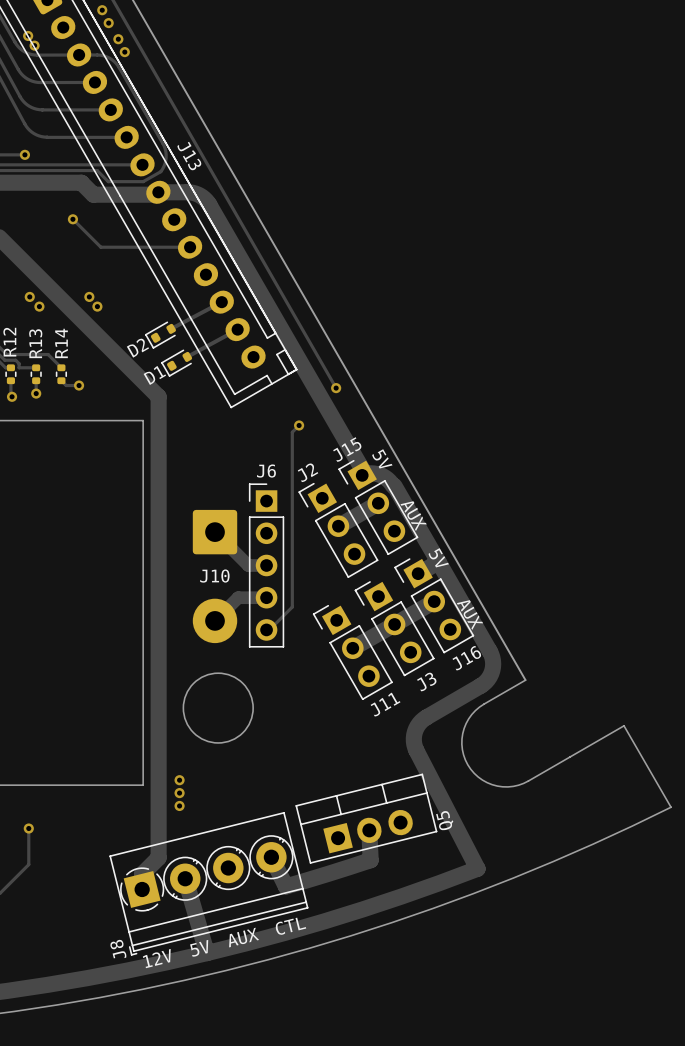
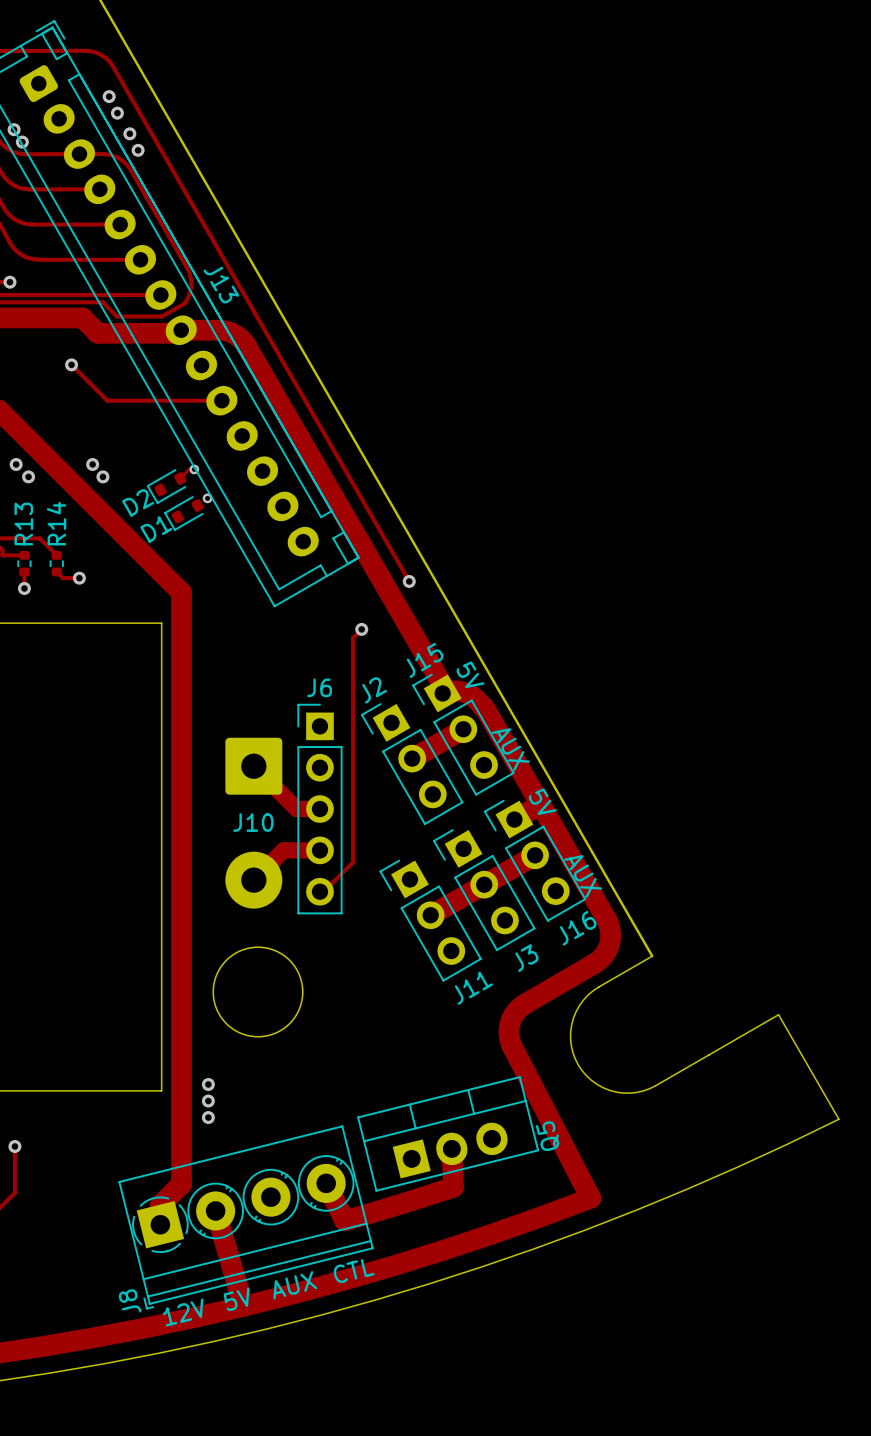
track: none -> (194, 469) (189, 469) (180, 478)
via: none -> (194, 469)
track: (221, 302) (171, 328) -> none
D2: none -> (166, 486)
via: none -> (207, 498)
track: (237, 329) (187, 356) -> none
D2 name: D2 (137, 348) -> D1 (156, 529)
D1: (176, 363) -> none

